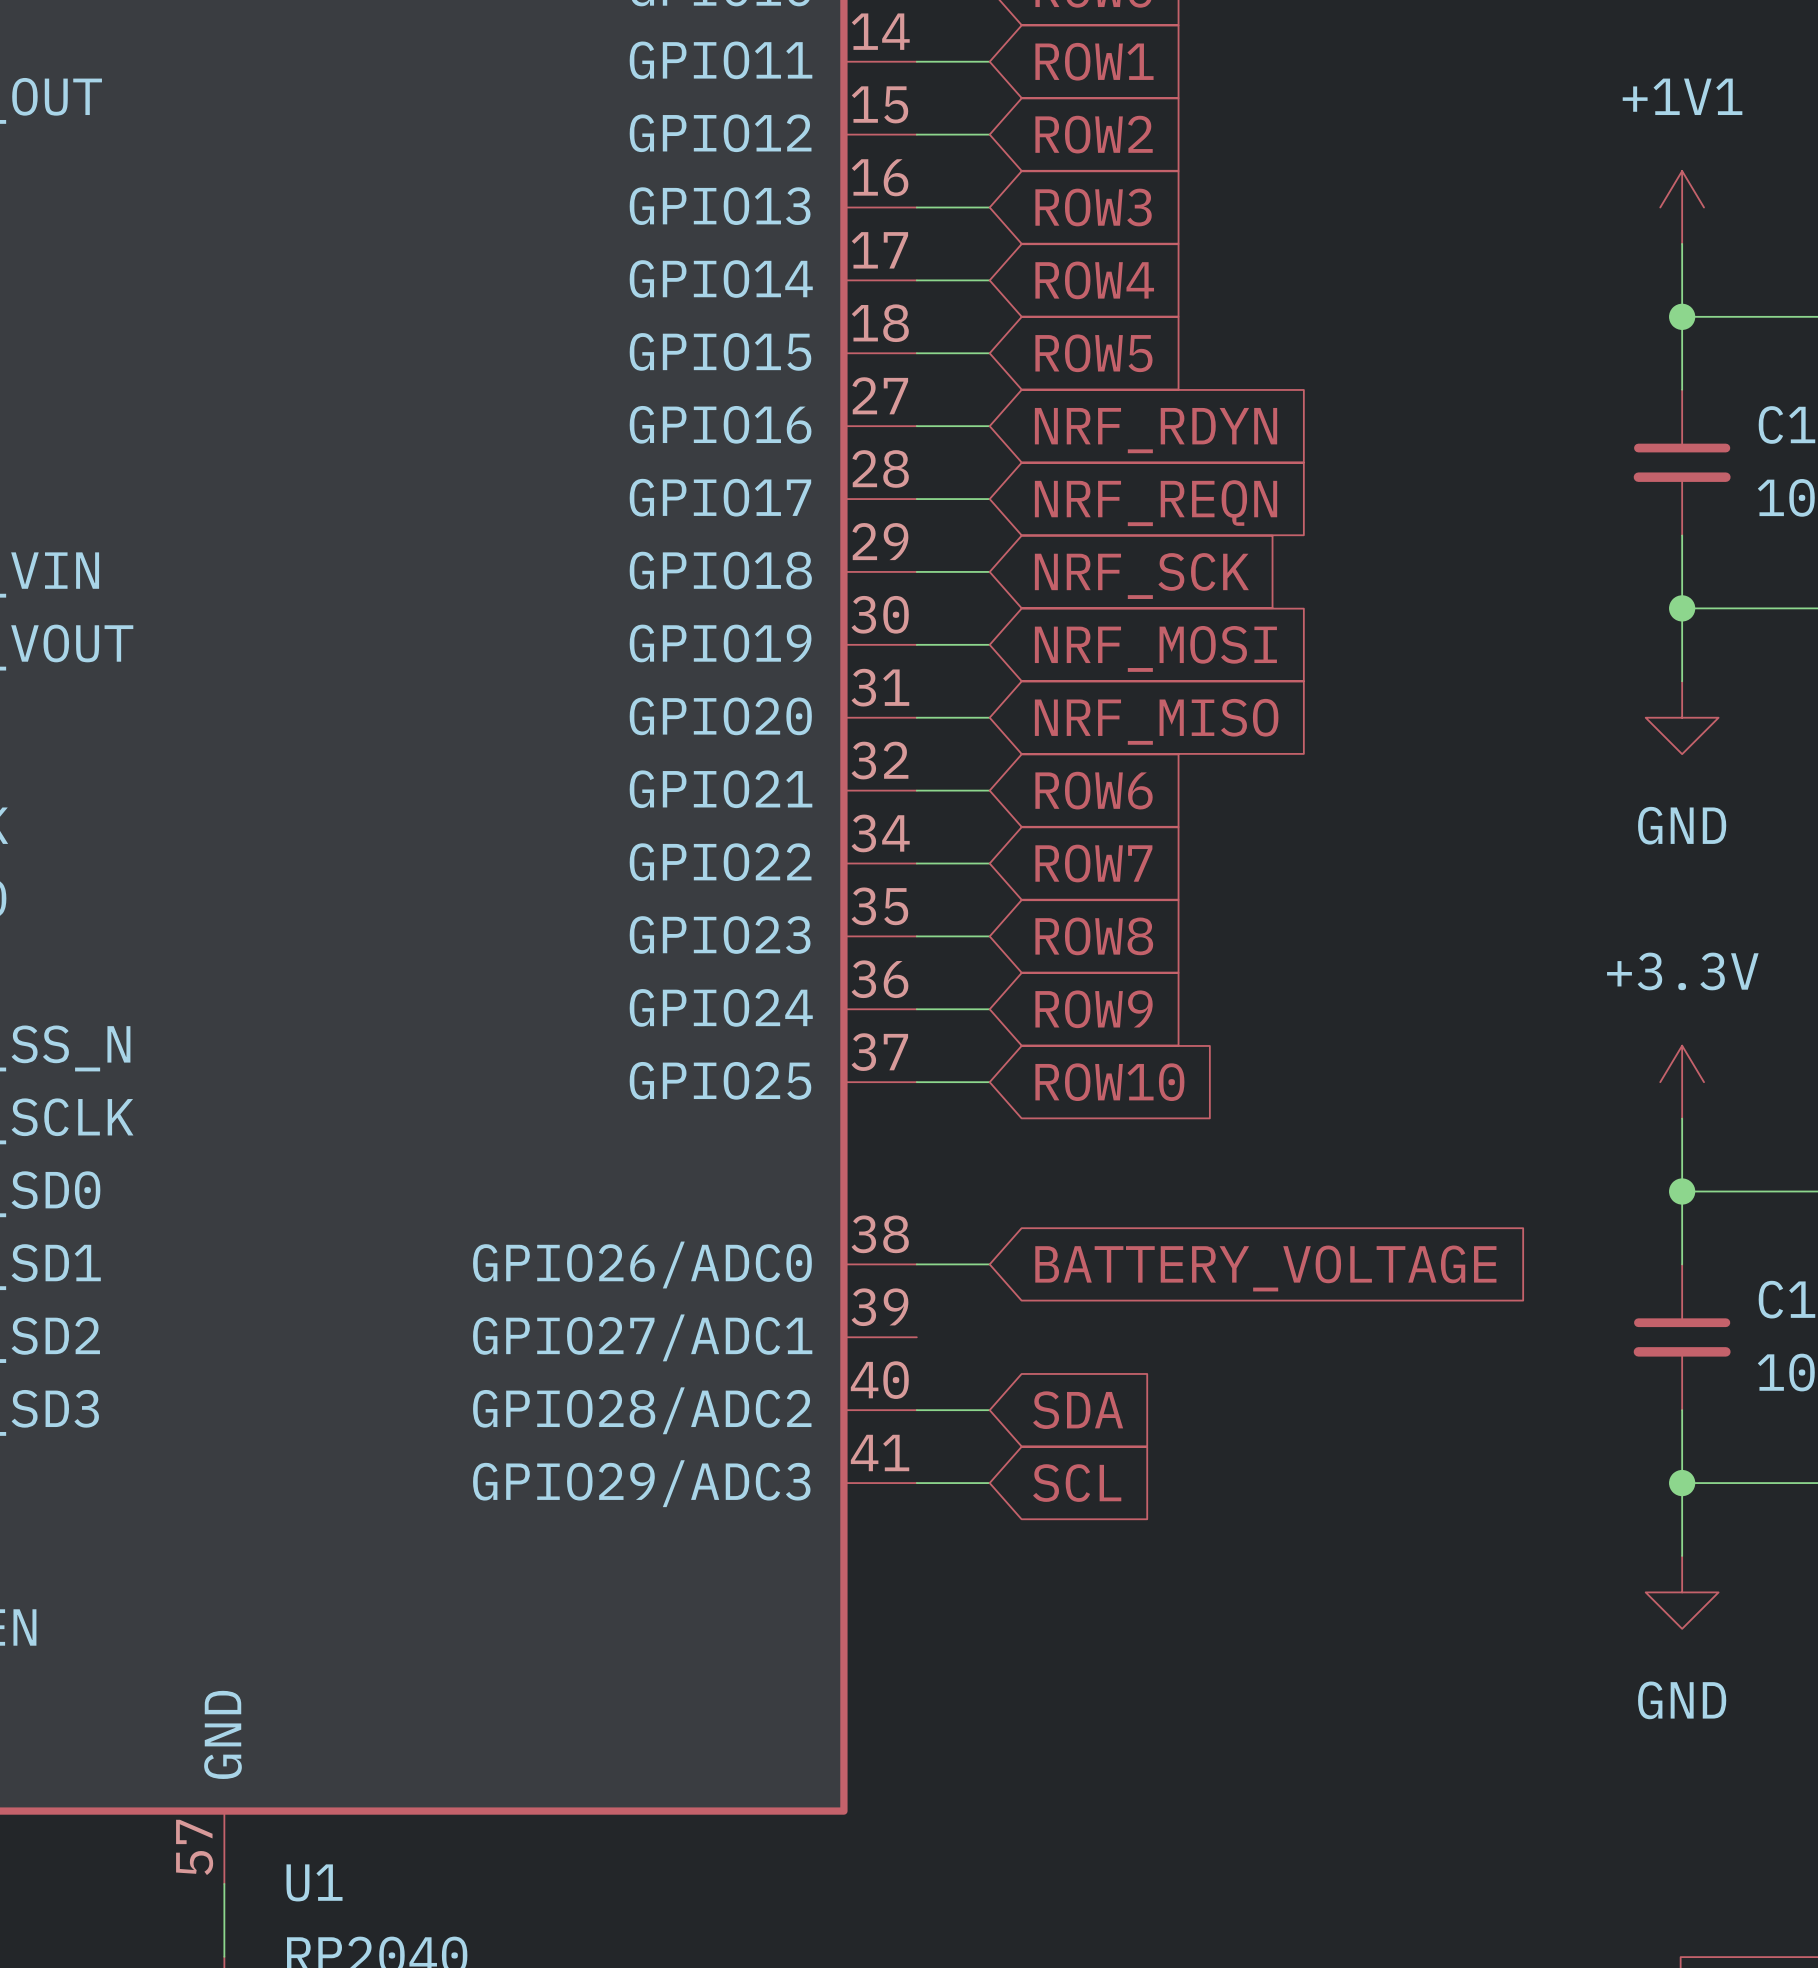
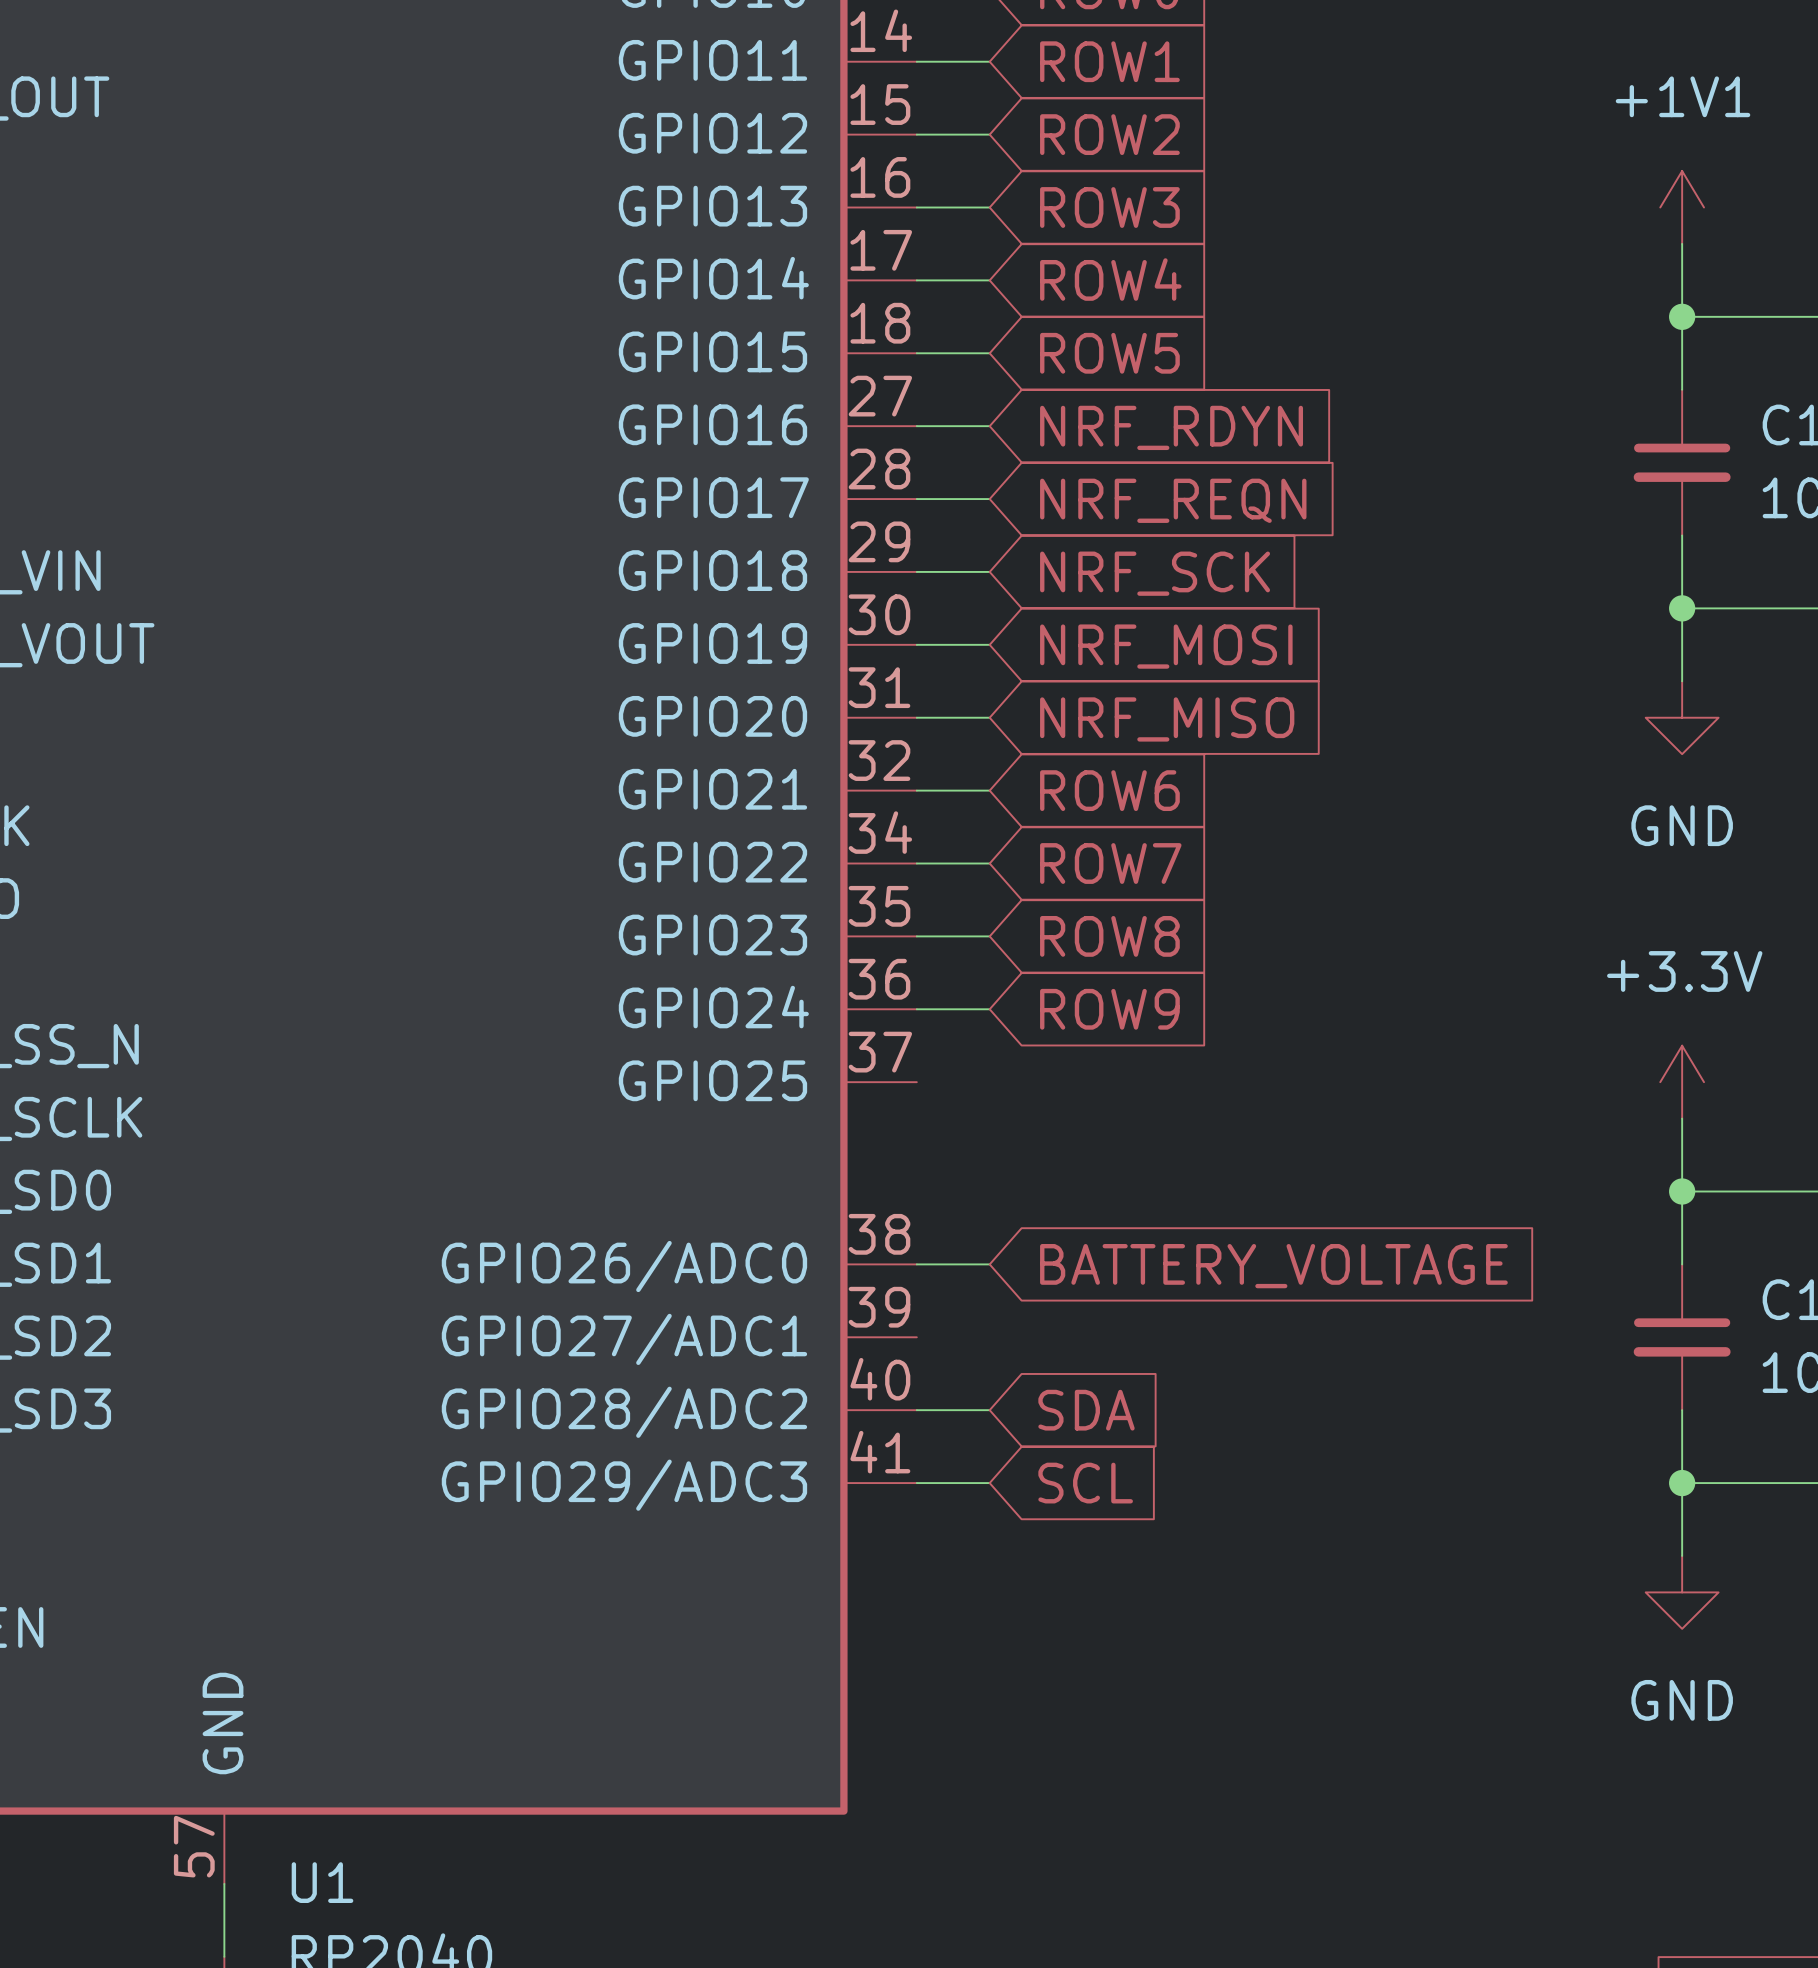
wire: (916, 1082) (989, 1082) -> none
global label: ROW10 (1109, 1082) -> none

